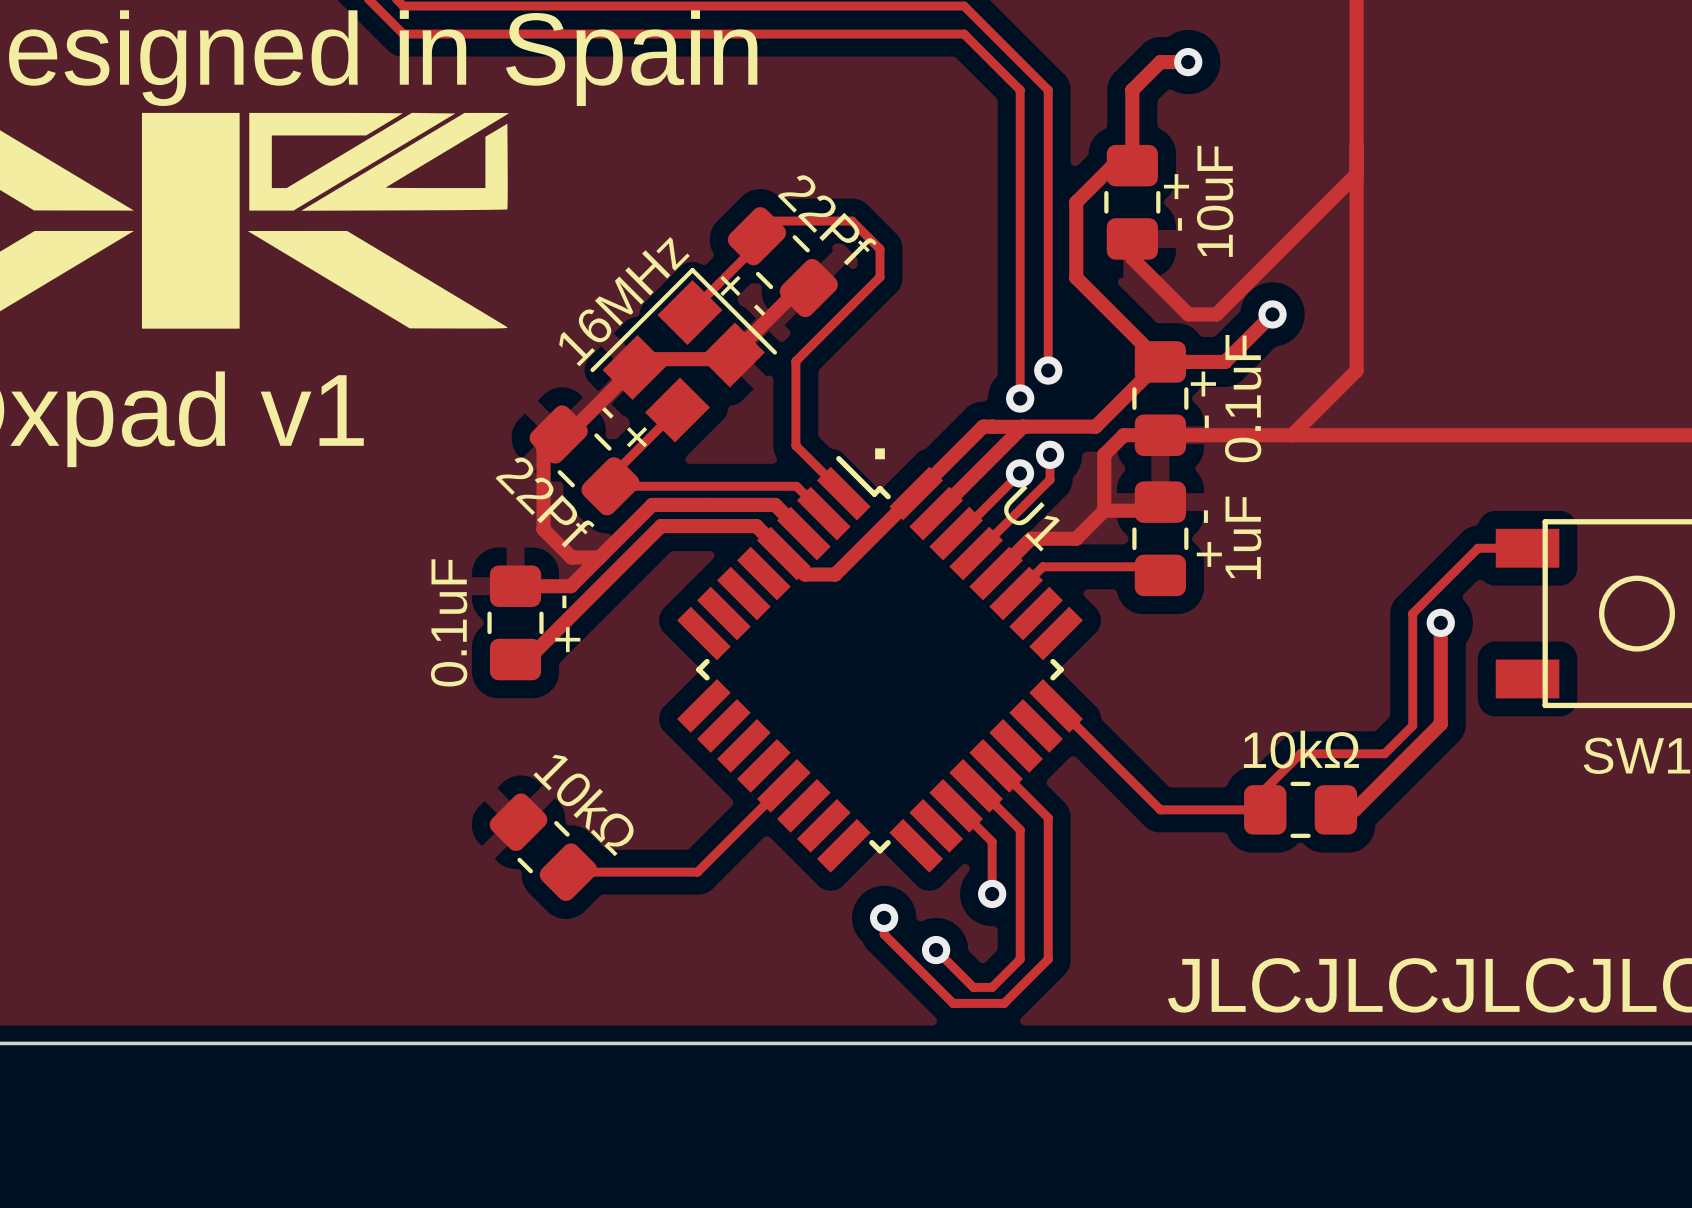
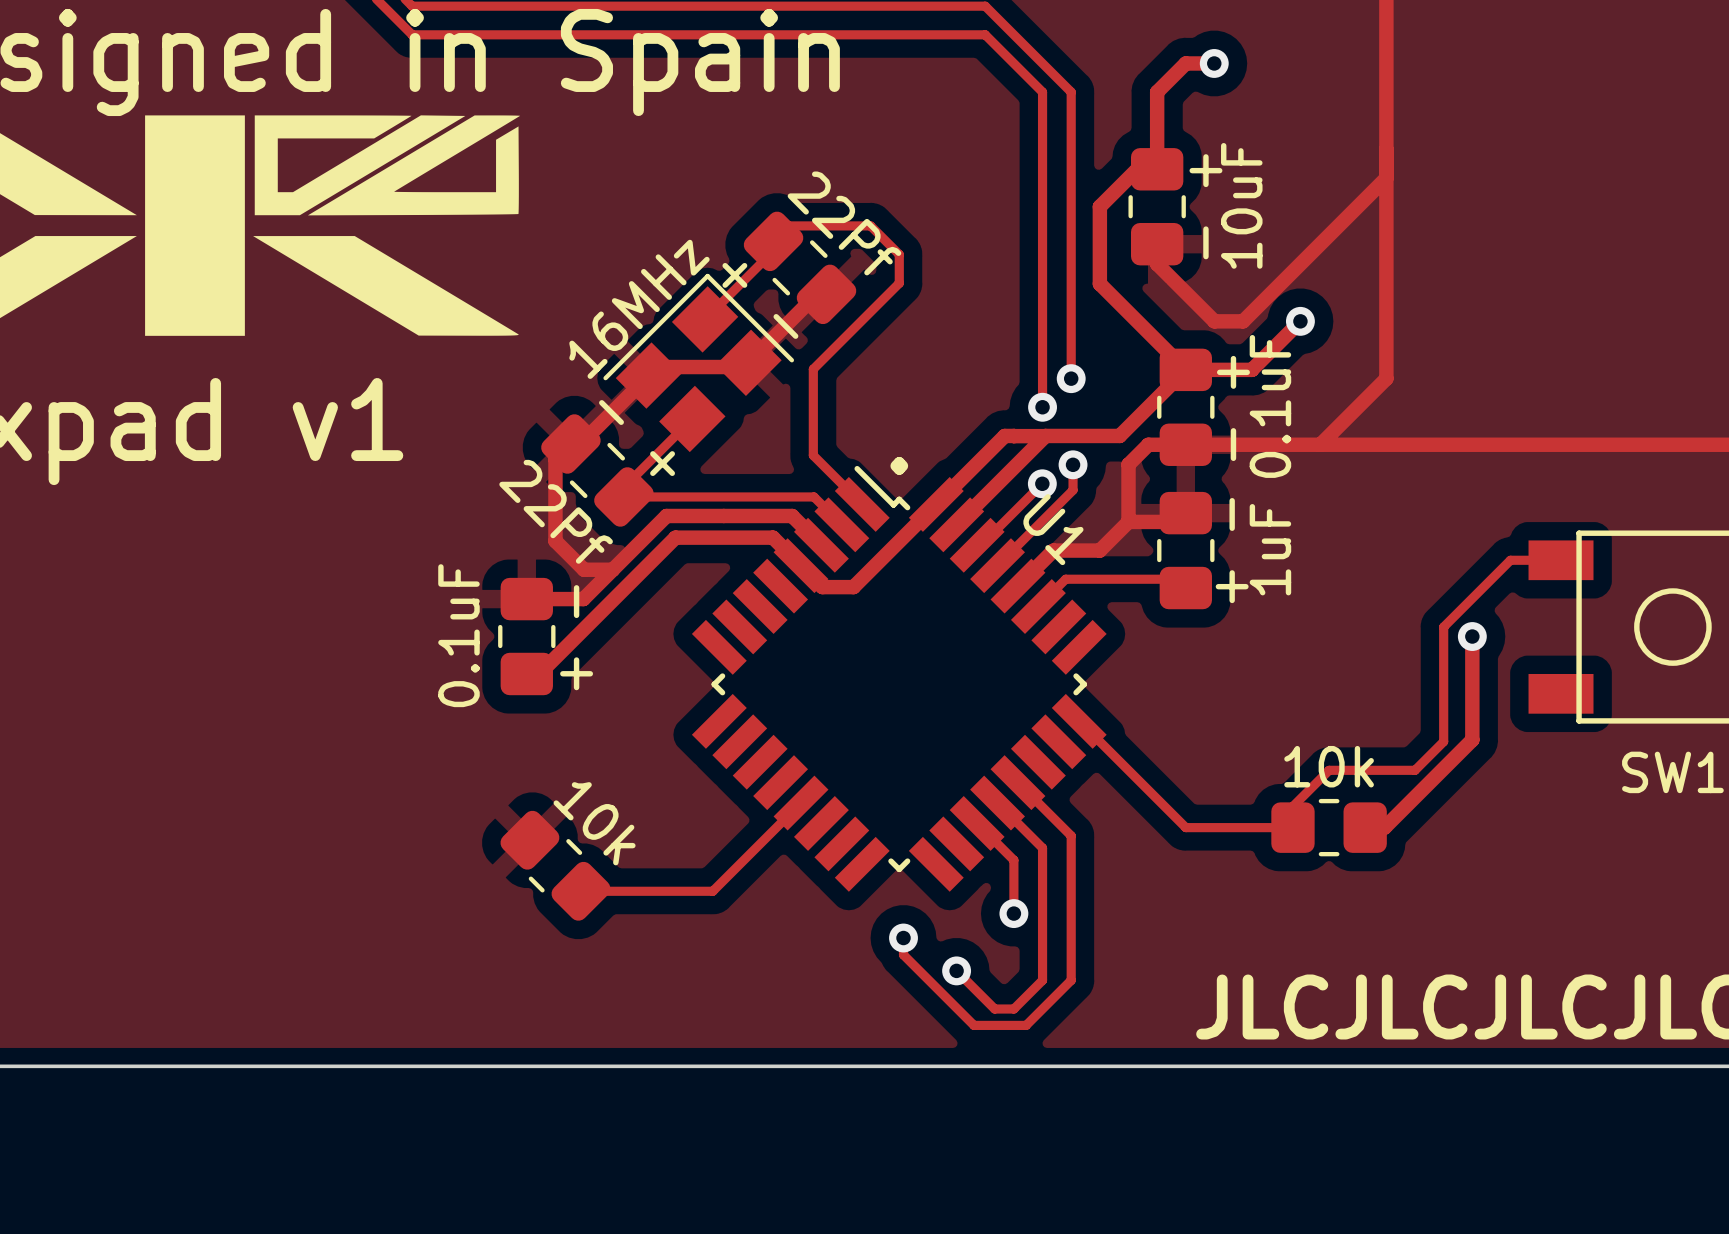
part value: 10kΩ (1301, 749) -> 10k (1329, 766)
part value: 10kΩ (583, 805) -> 10k (594, 823)

